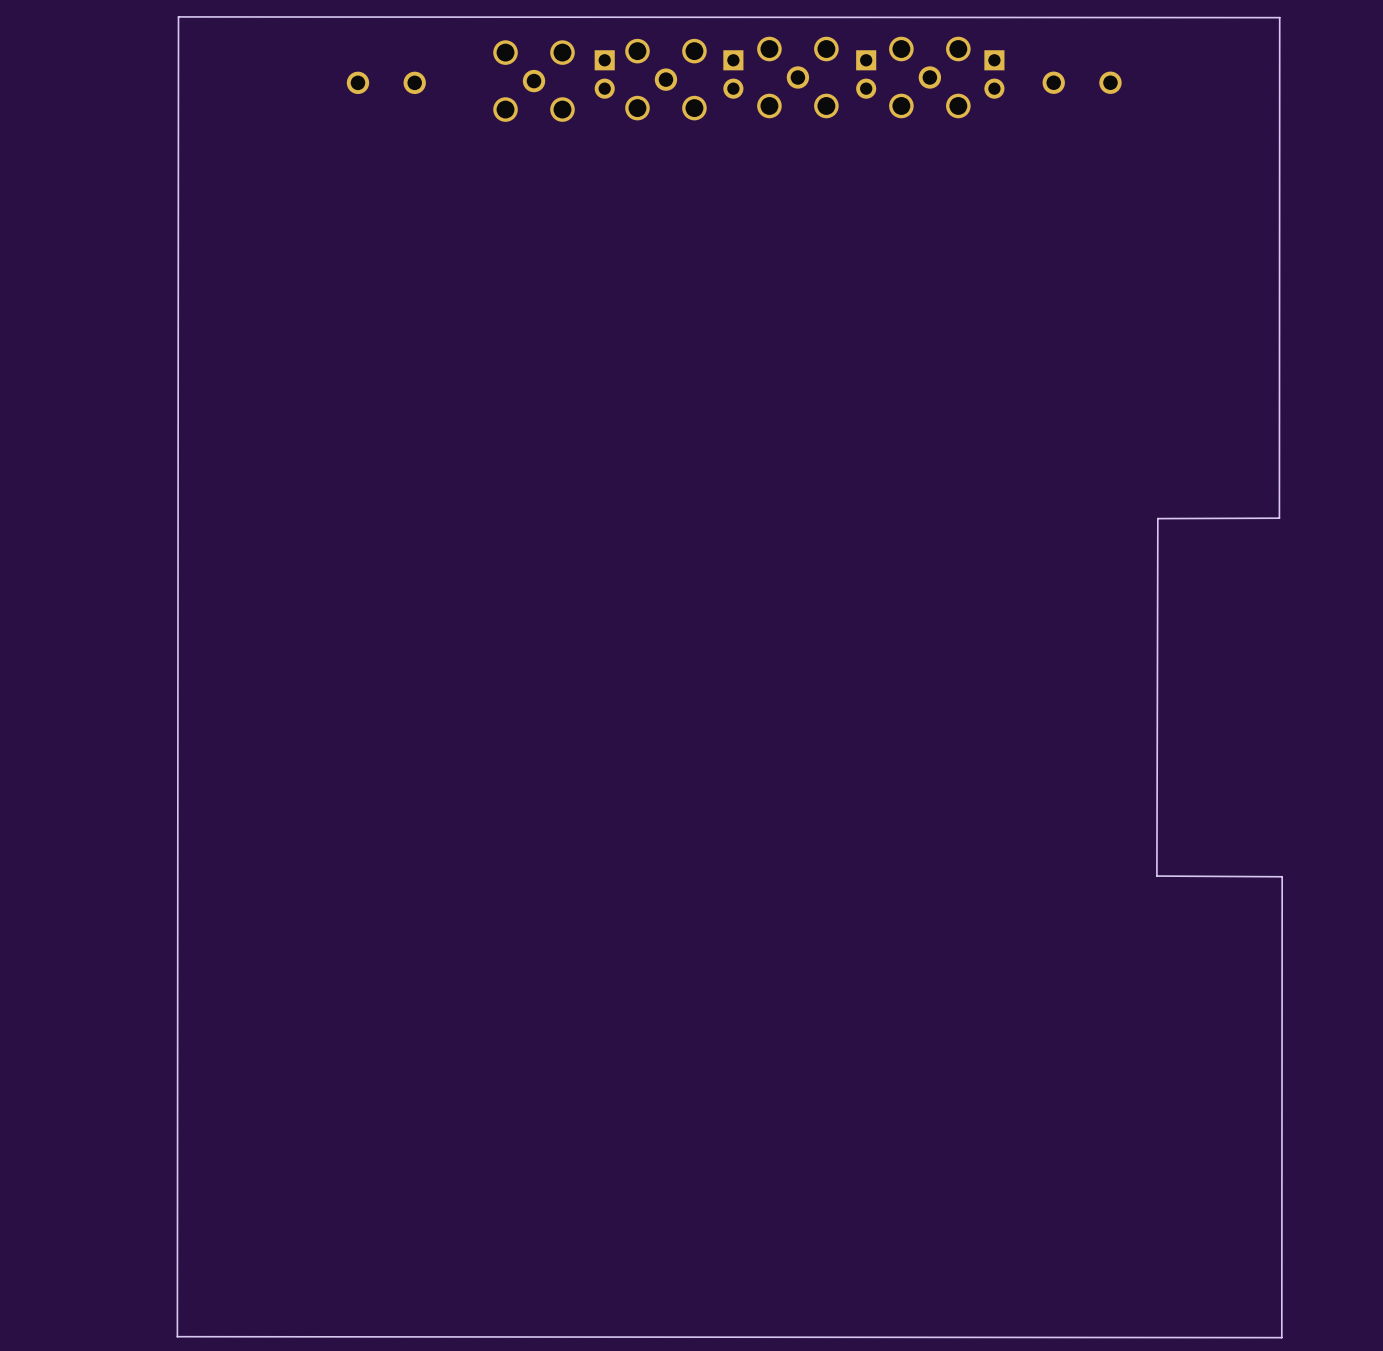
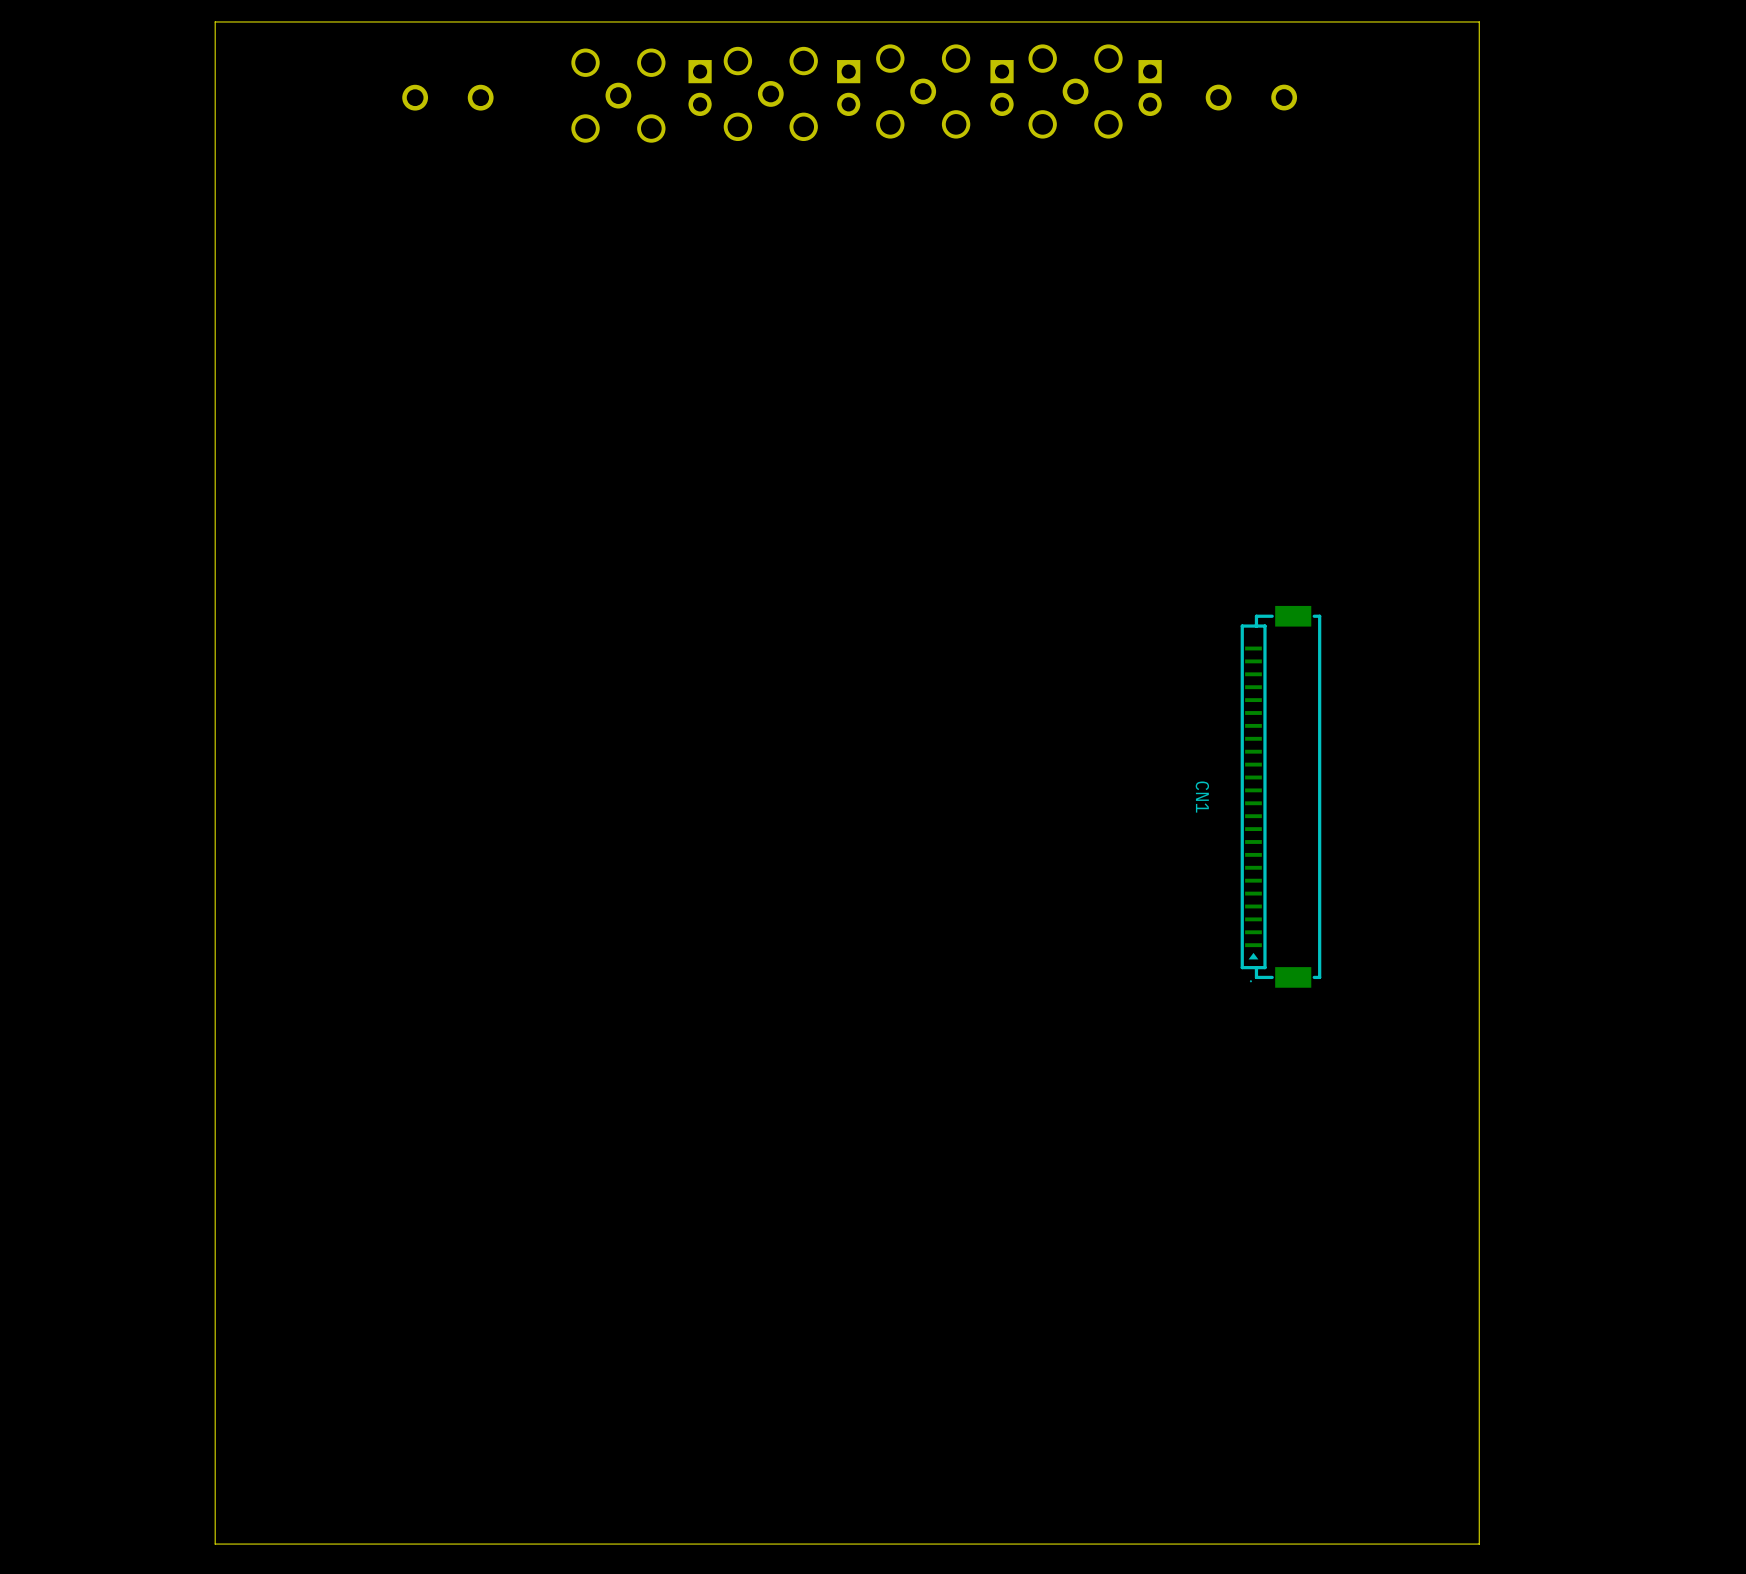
board edge: (178, 16) (1279, 17) (1279, 518) (1157, 518) (1156, 876) (1282, 876) (1281, 1337) (177, 1336) (178, 16) -> (1479, 21) (1479, 1544) (215, 1544) (215, 21) (1479, 21)
CN1: none -> (1280, 796)

